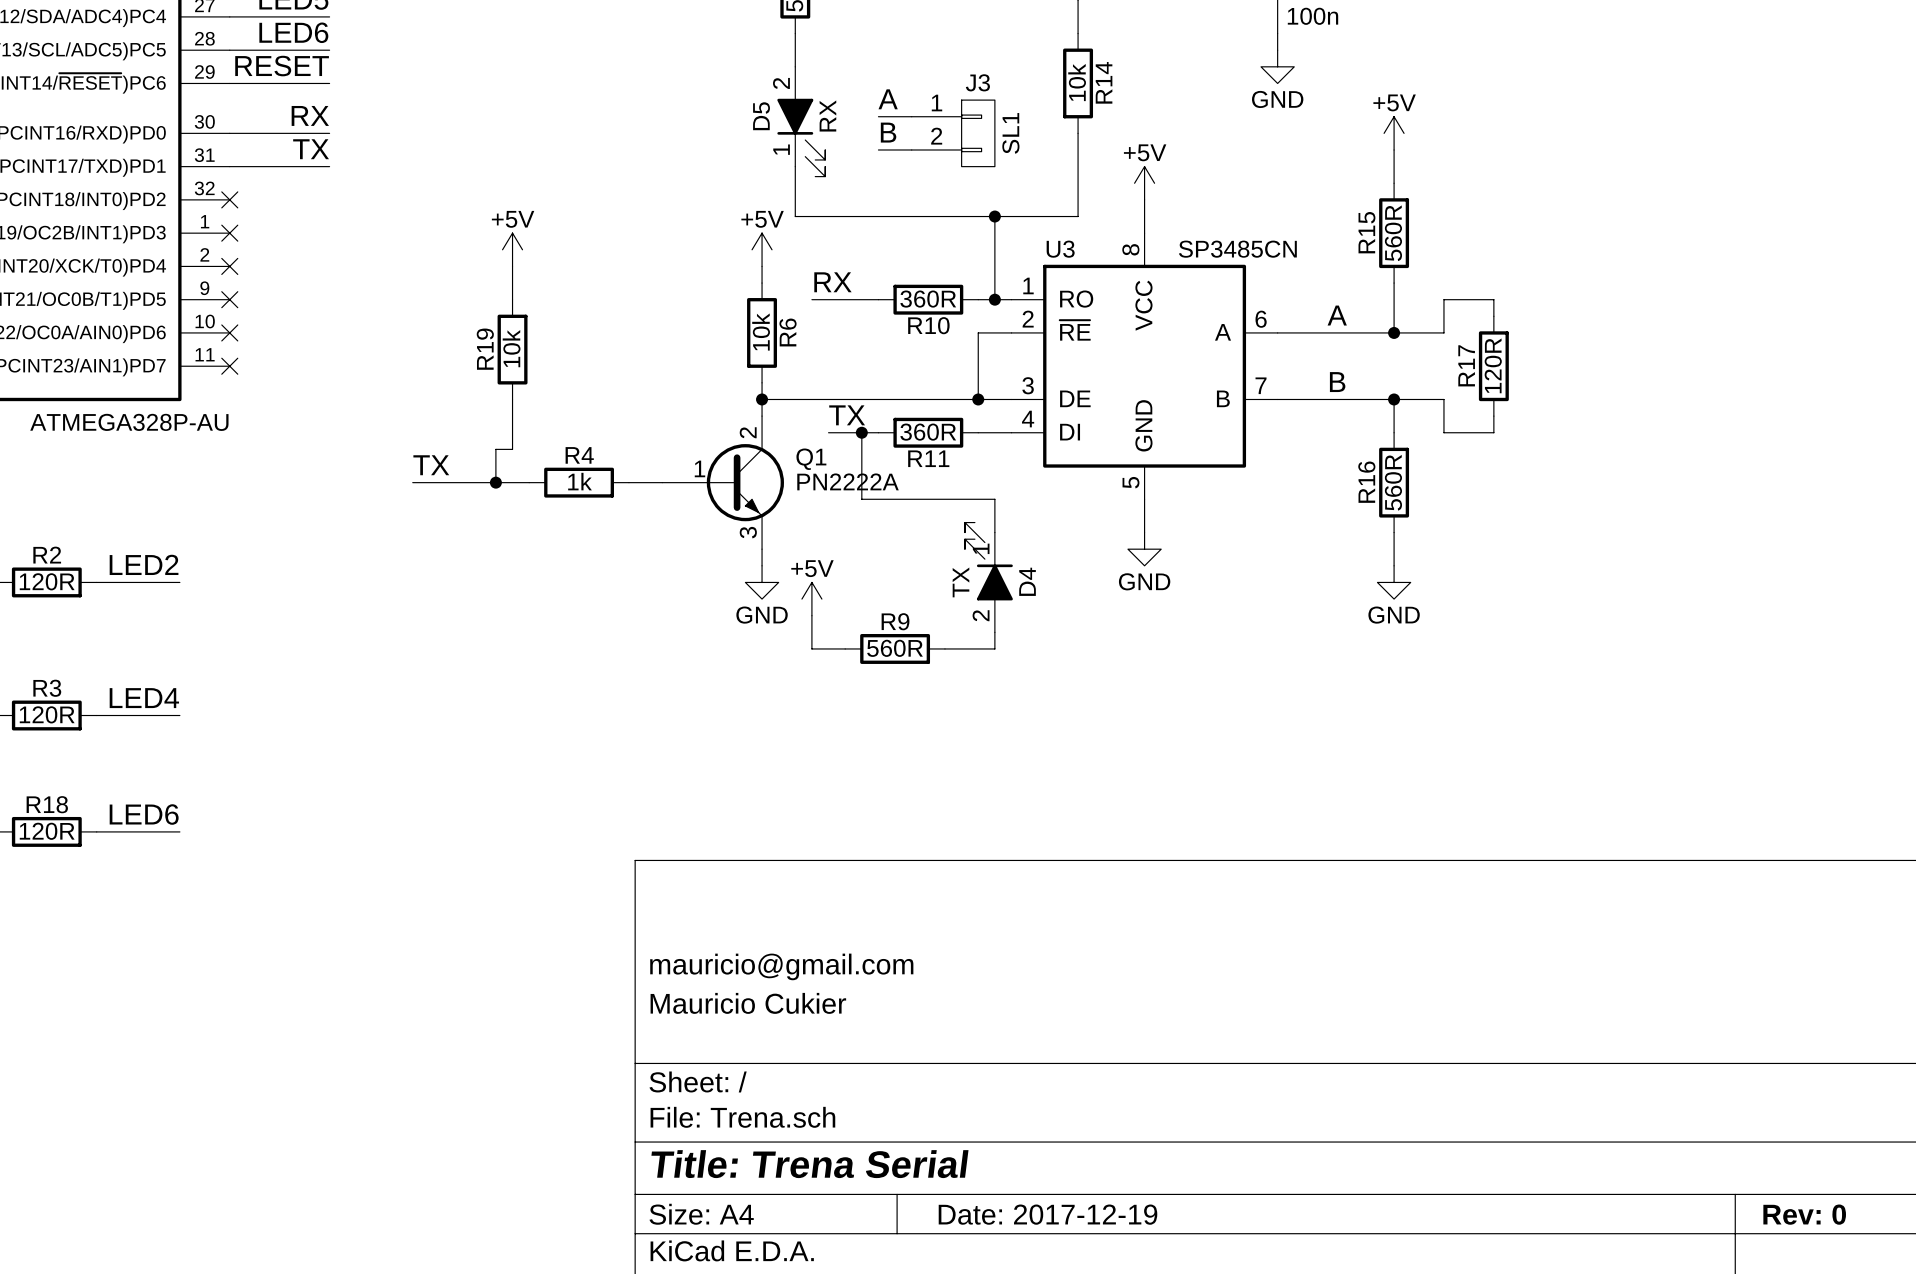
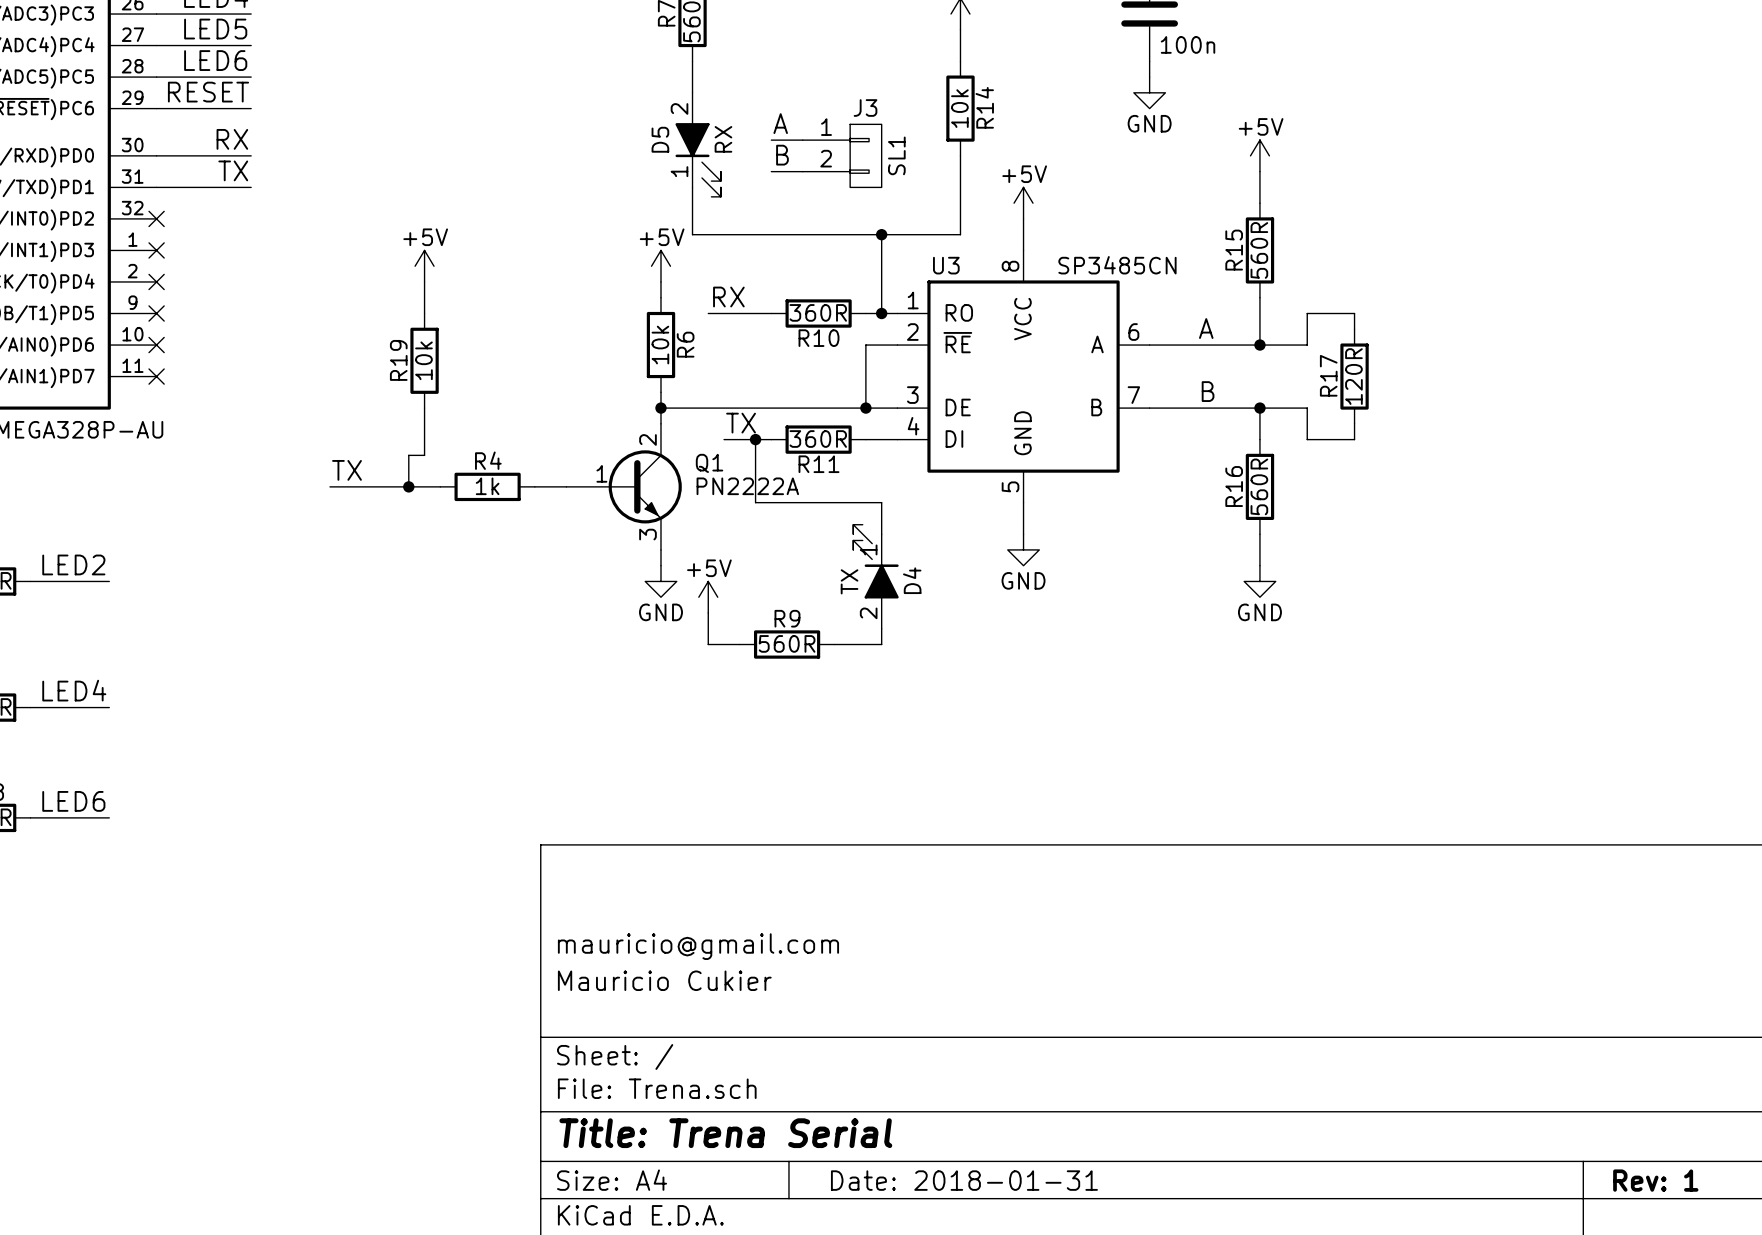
title block: Date: 2017-12-19 (1047, 1214) -> Date: 2018-01-31 (964, 1180)
title block: Rev: 0 (1804, 1214) -> Rev: 1 (1655, 1180)

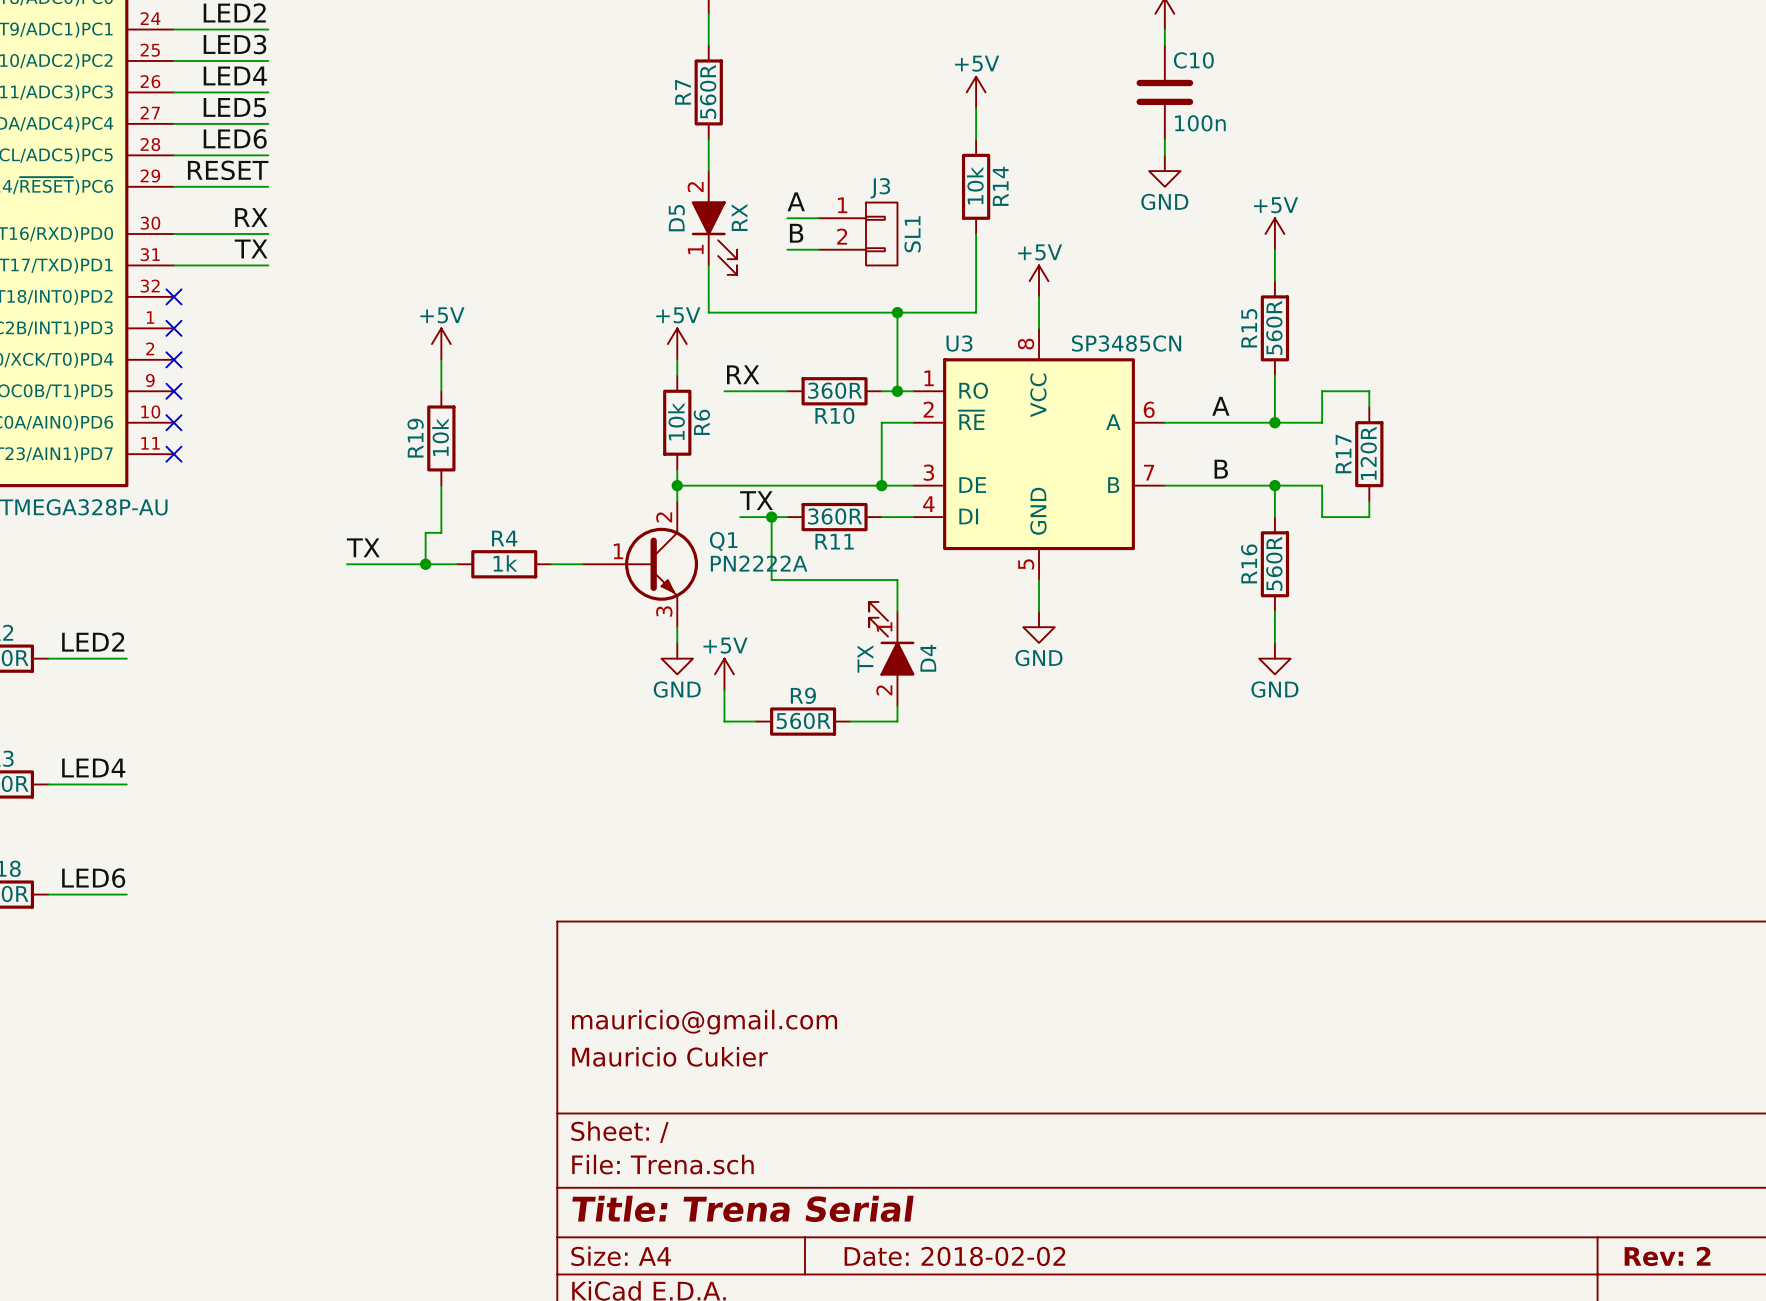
title block: Date: 2018-01-31 (964, 1180) -> Date: 2018-02-02 (954, 1256)
title block: Rev: 1 (1655, 1180) -> Rev: 2 (1667, 1256)

